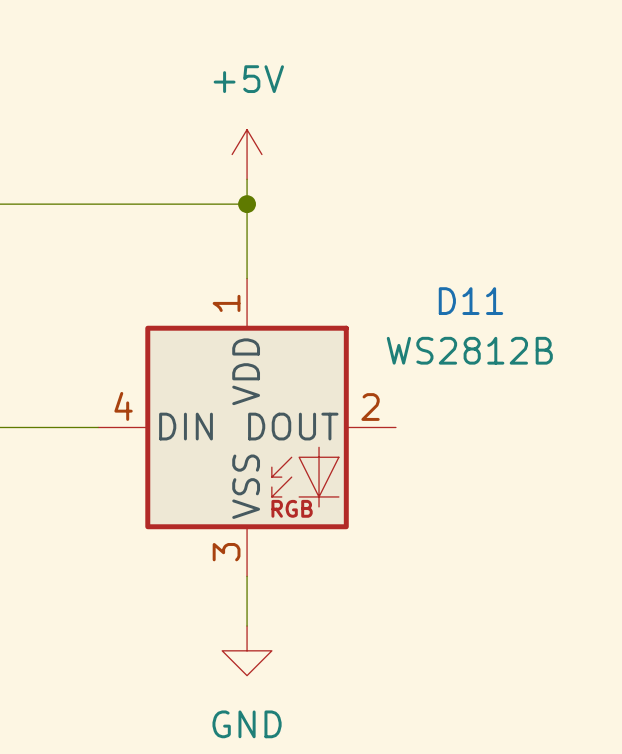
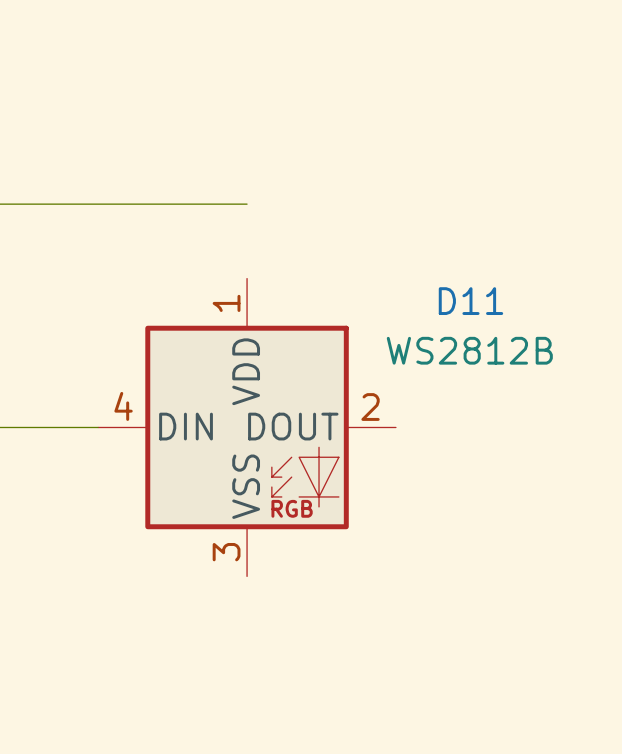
power symbol: +5V (247, 154) -> none
wire: (247, 179) (247, 278) -> none
junction: (247, 204) -> none
wire: (247, 576) (247, 626) -> none
power symbol: GND (247, 650) -> none

